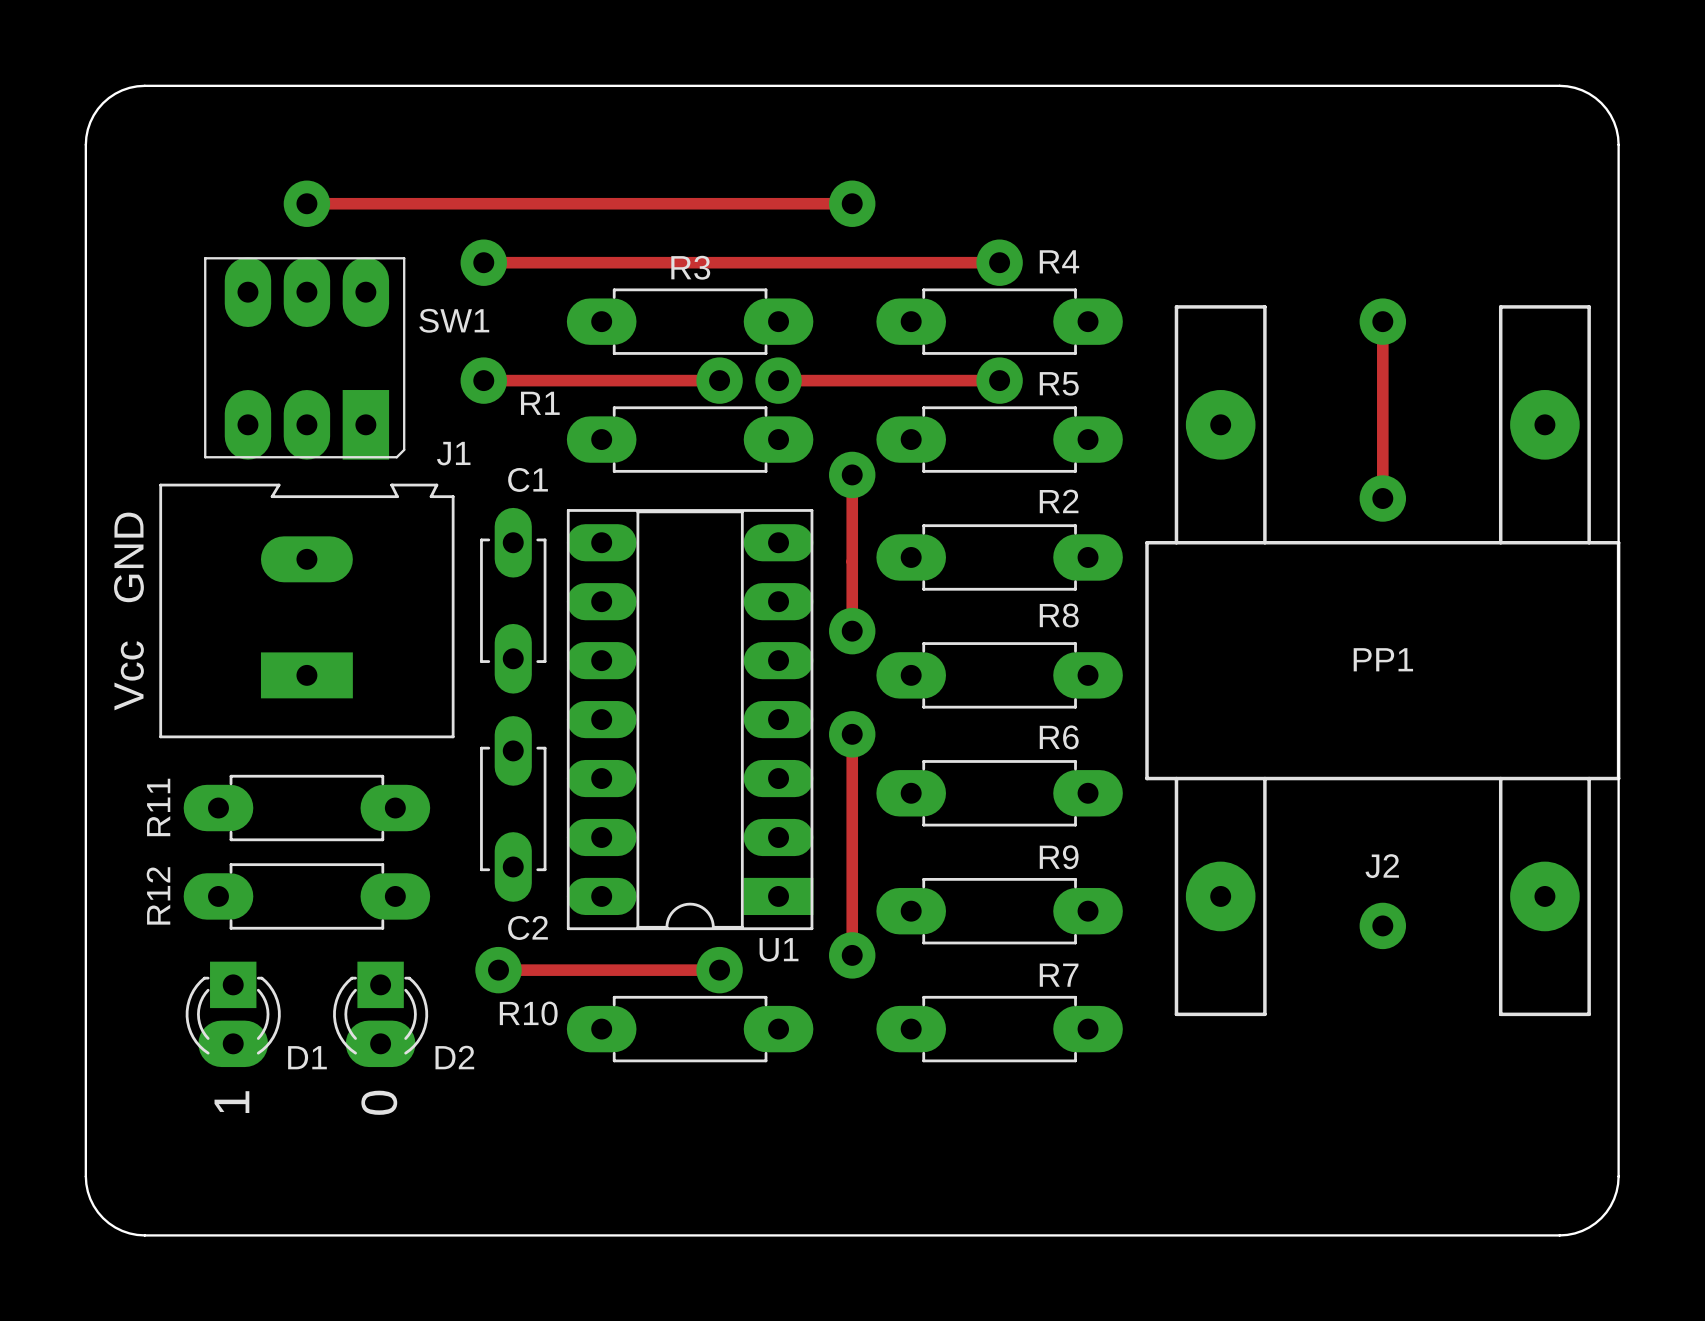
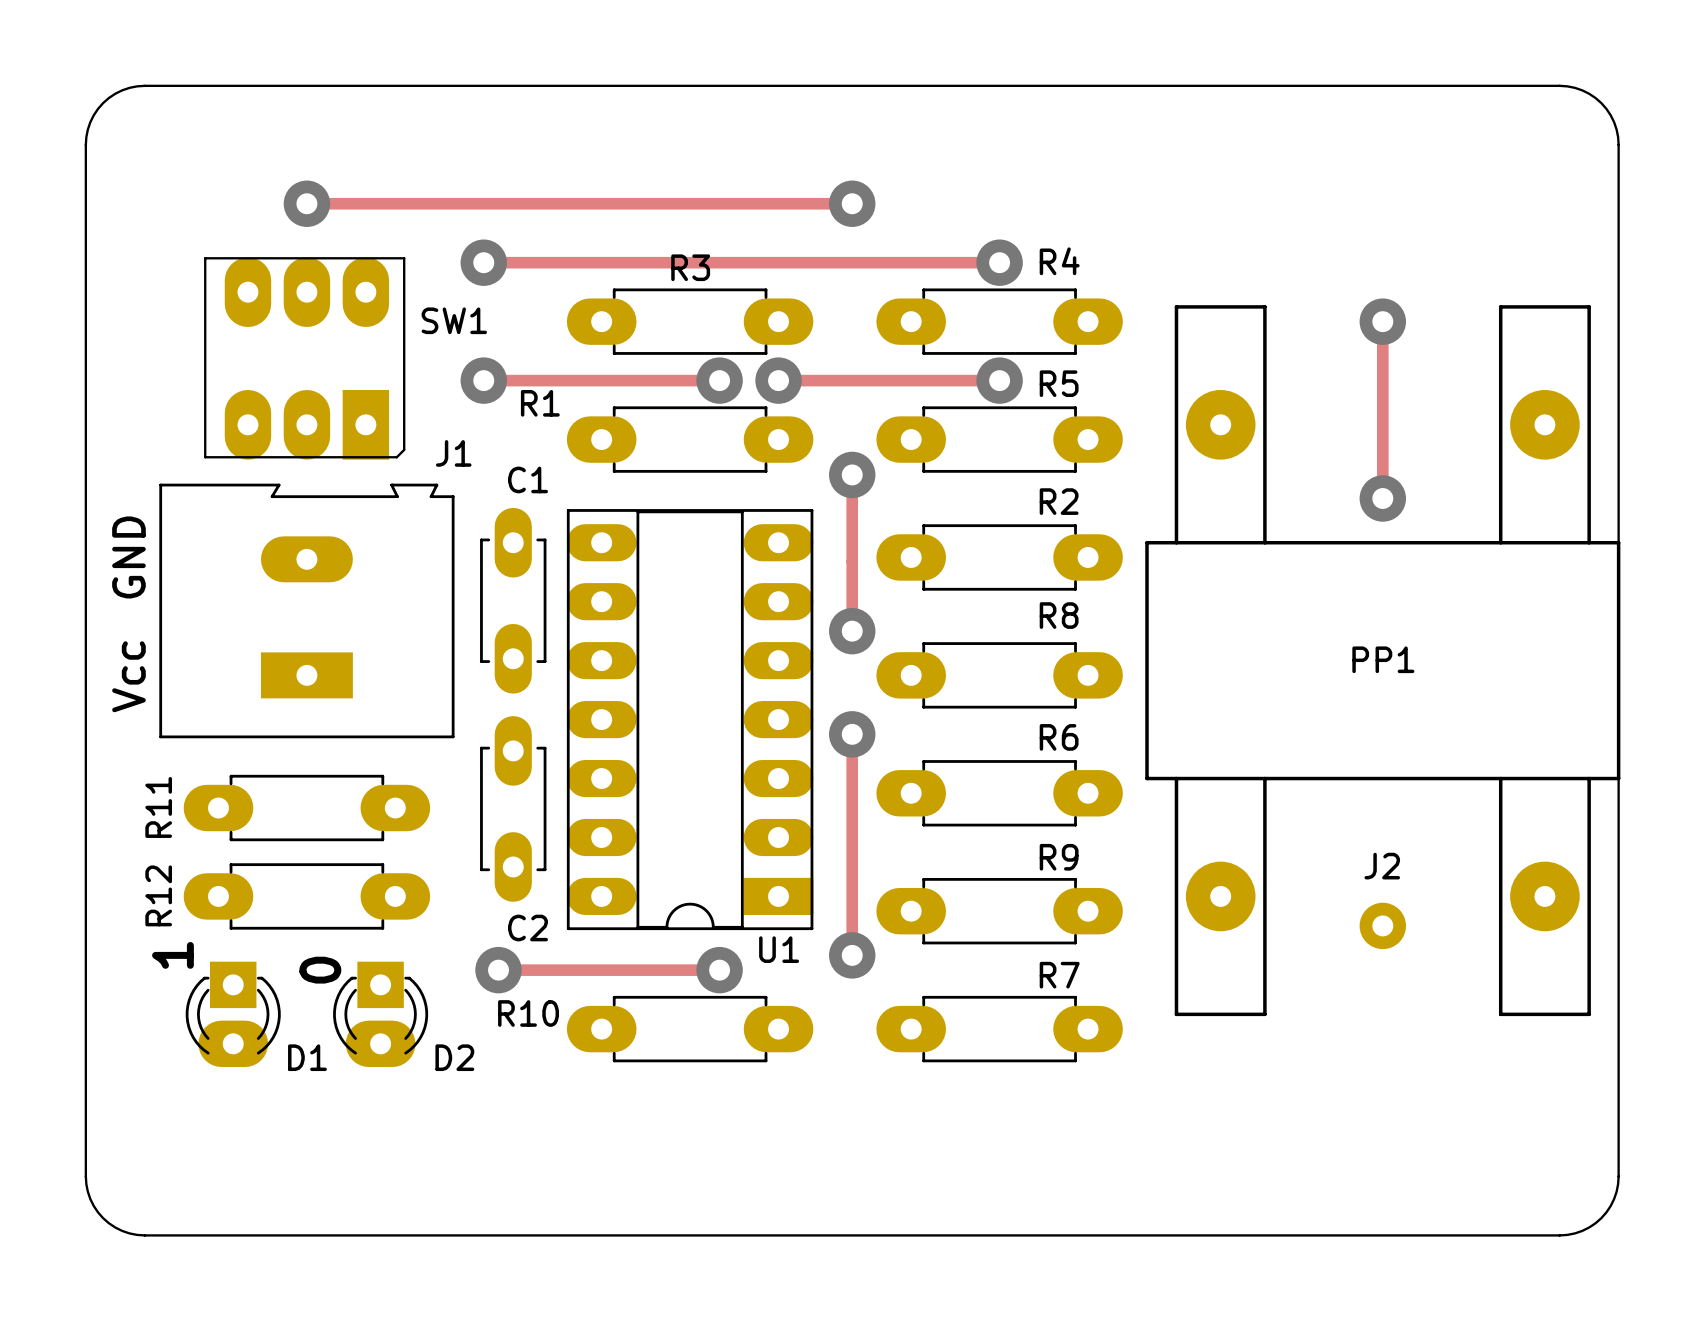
text position: 1 (231, 1102) -> 1 (172, 955)
text position: 0 (379, 1102) -> 0 (320, 970)

